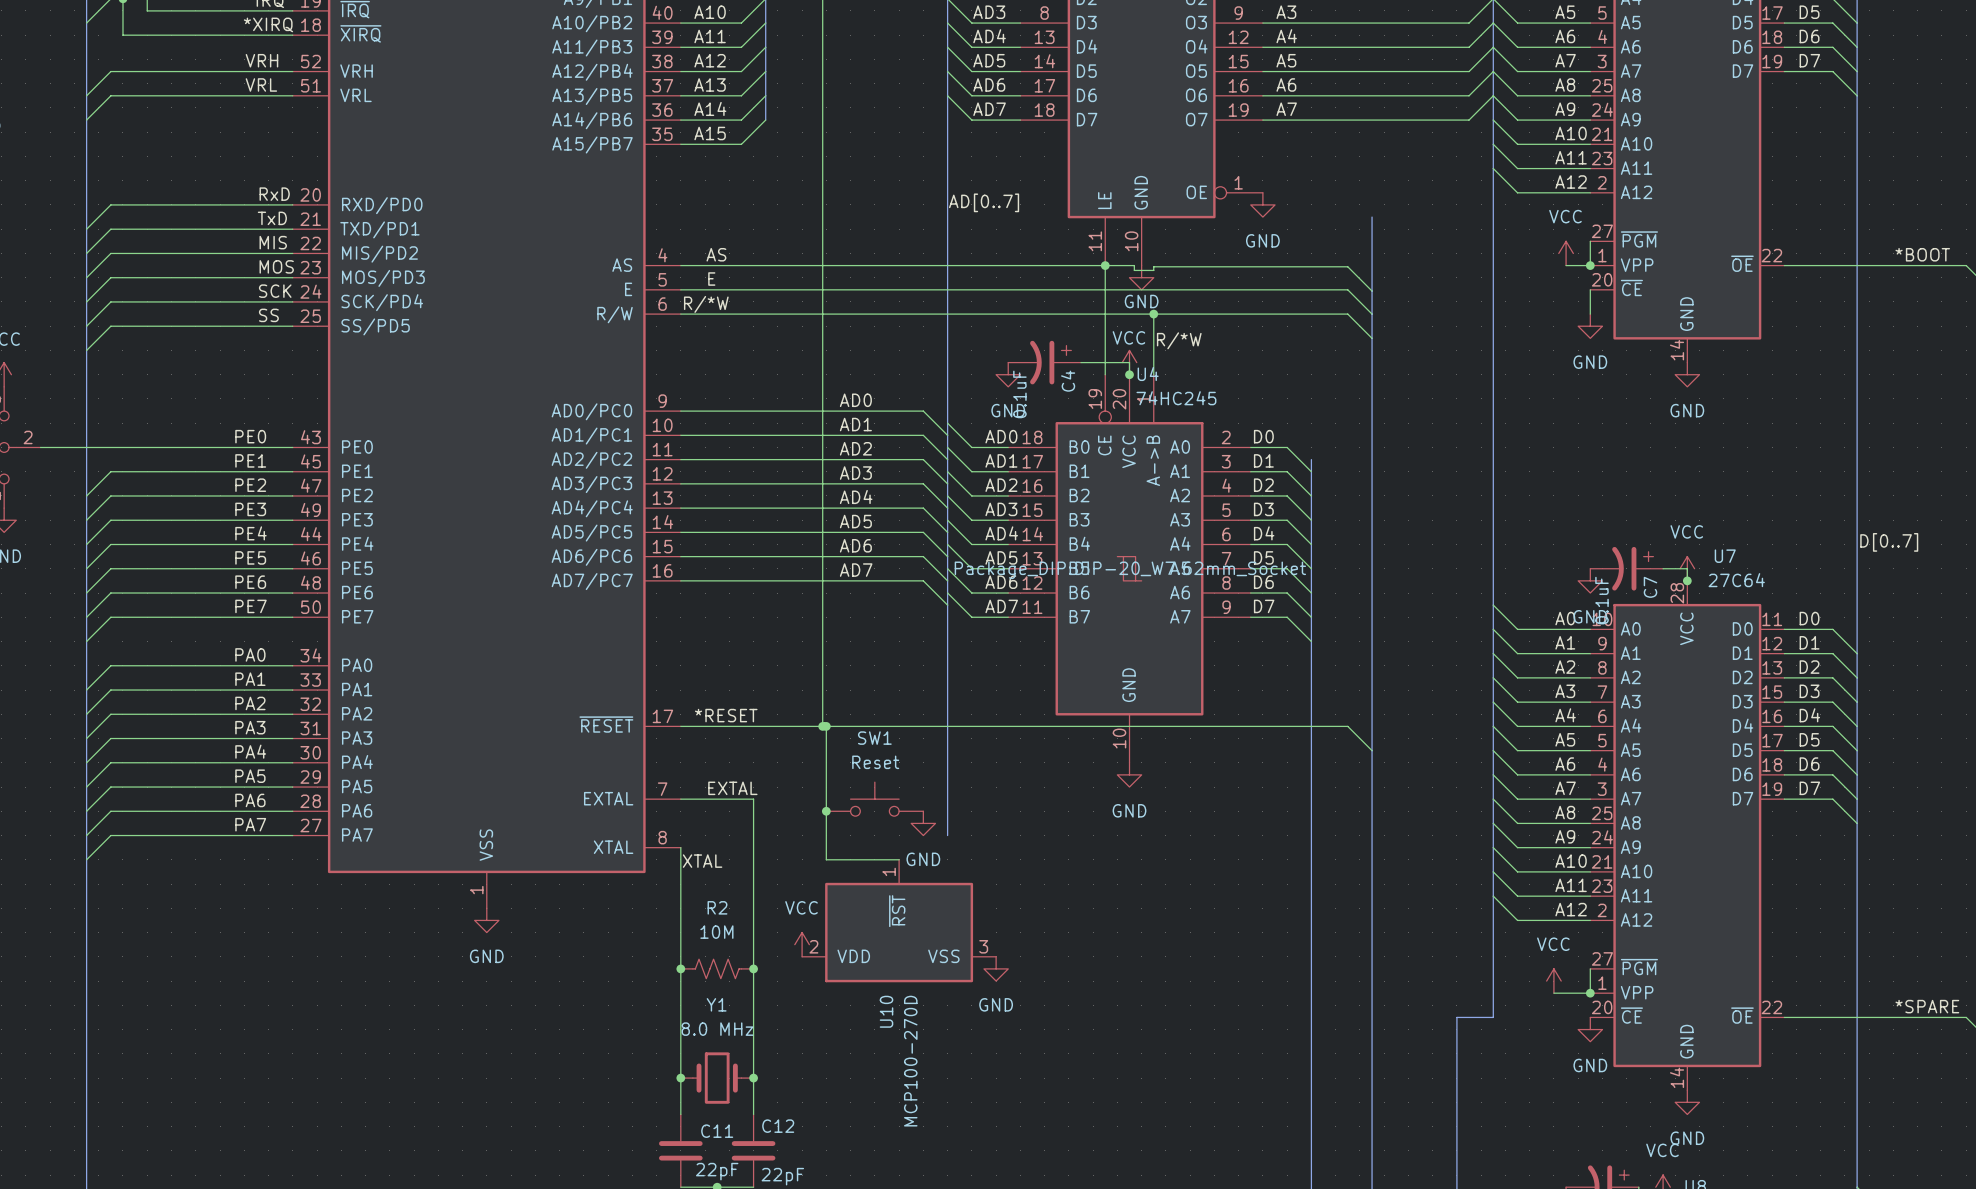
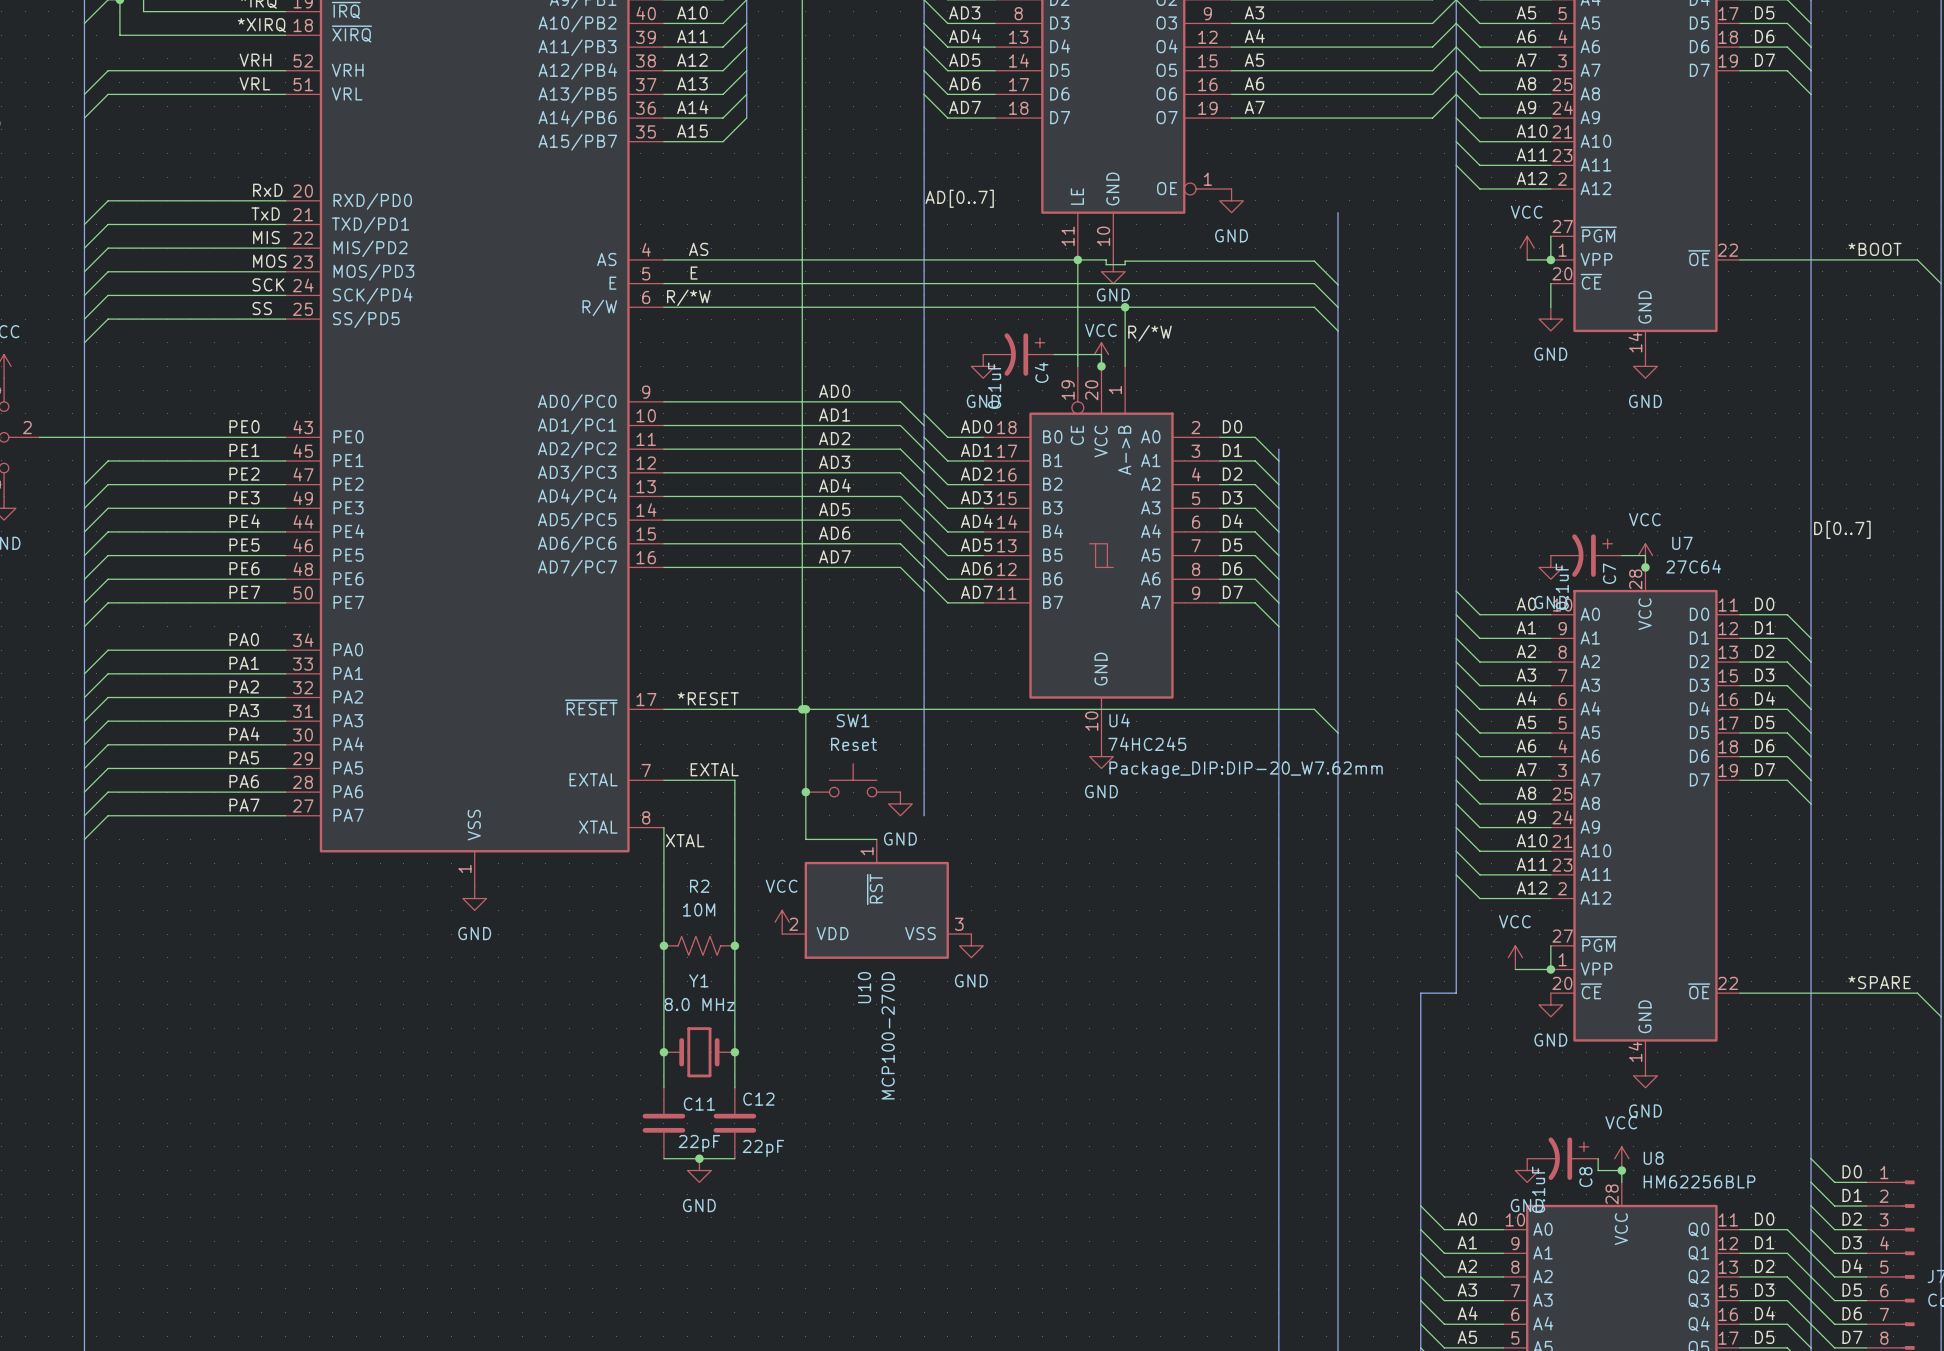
U4 name position: U4 (1148, 373) -> U4 (1119, 720)
U4 value position: 74HC245 (1176, 398) -> 74HC245 (1147, 744)
U4 text: Package_DIP:DIP-20_W7.62mm_Socket (1130, 570) -> Package_DIP:DIP-20_W7.62mm (1246, 769)

